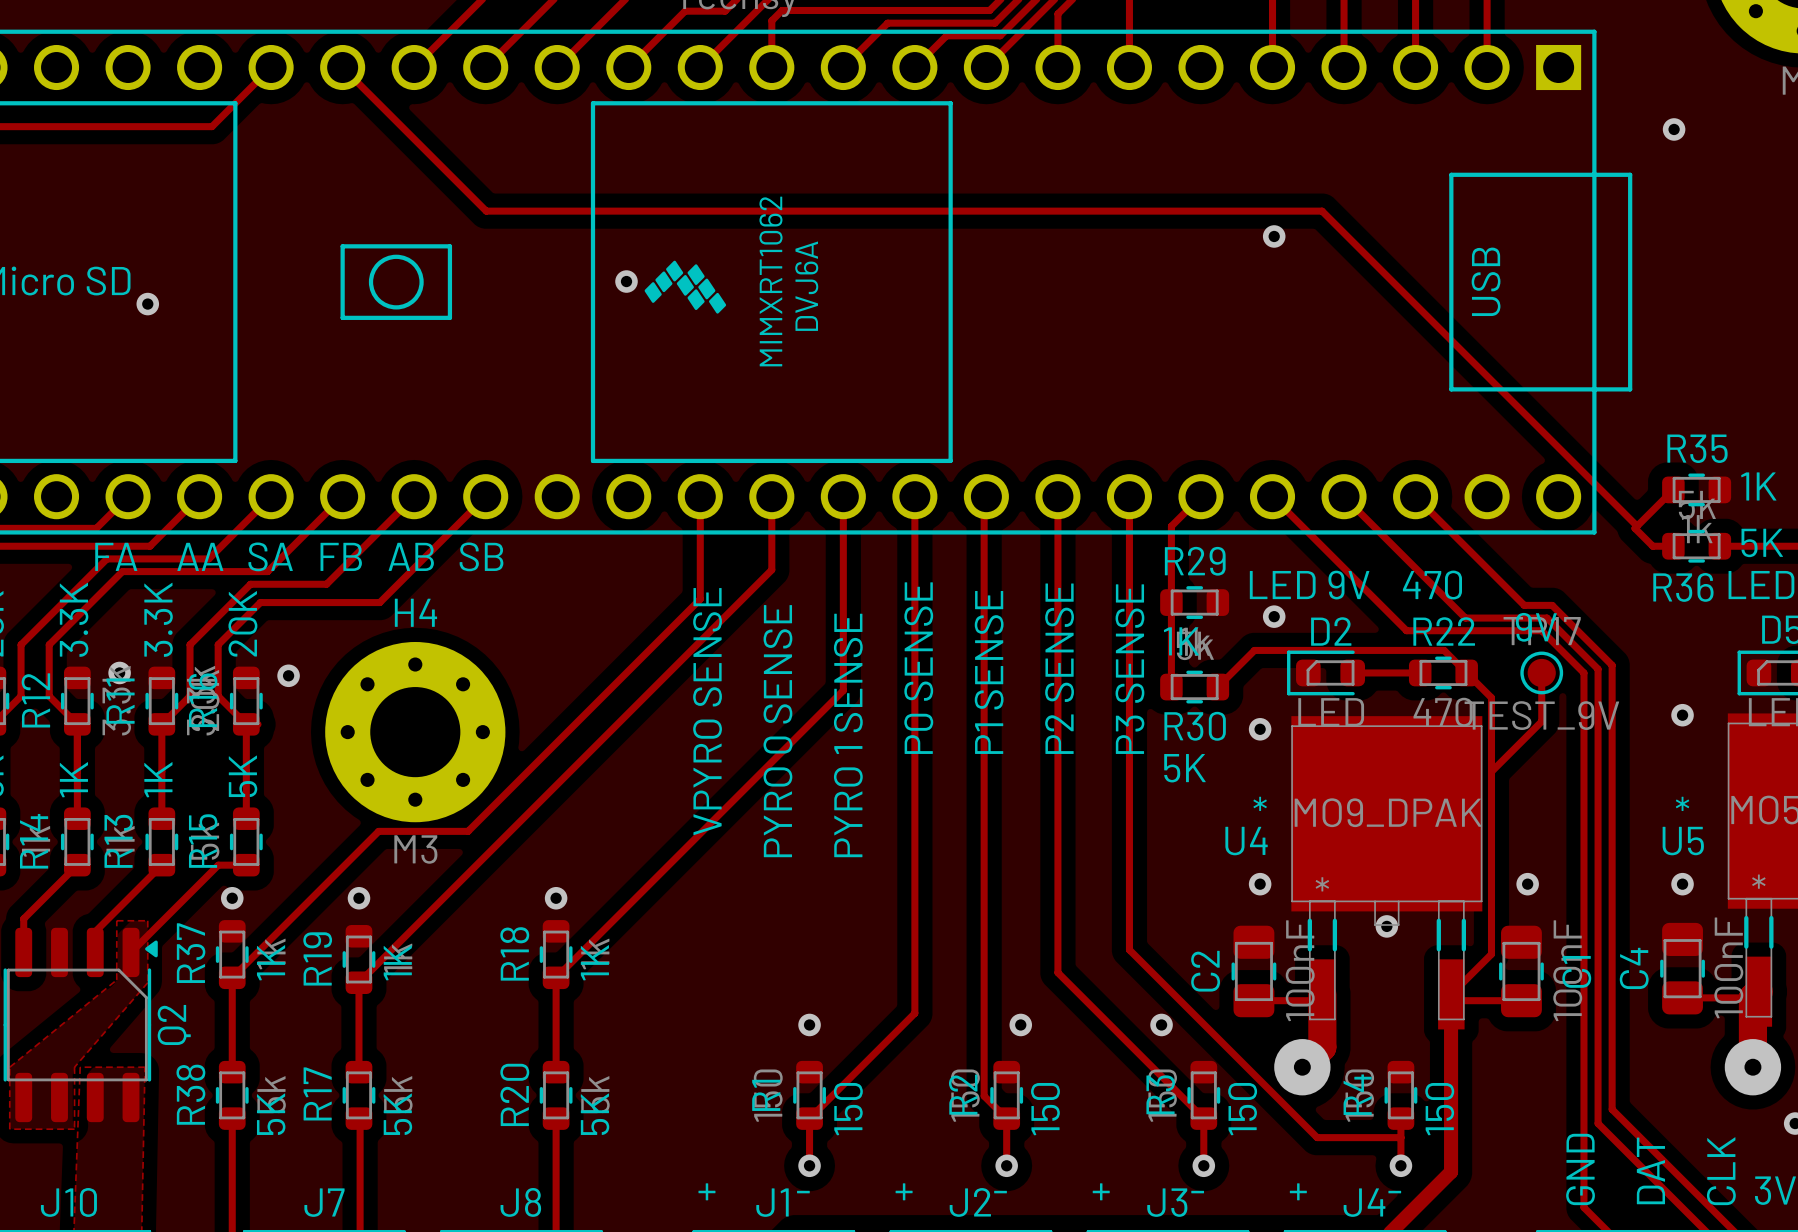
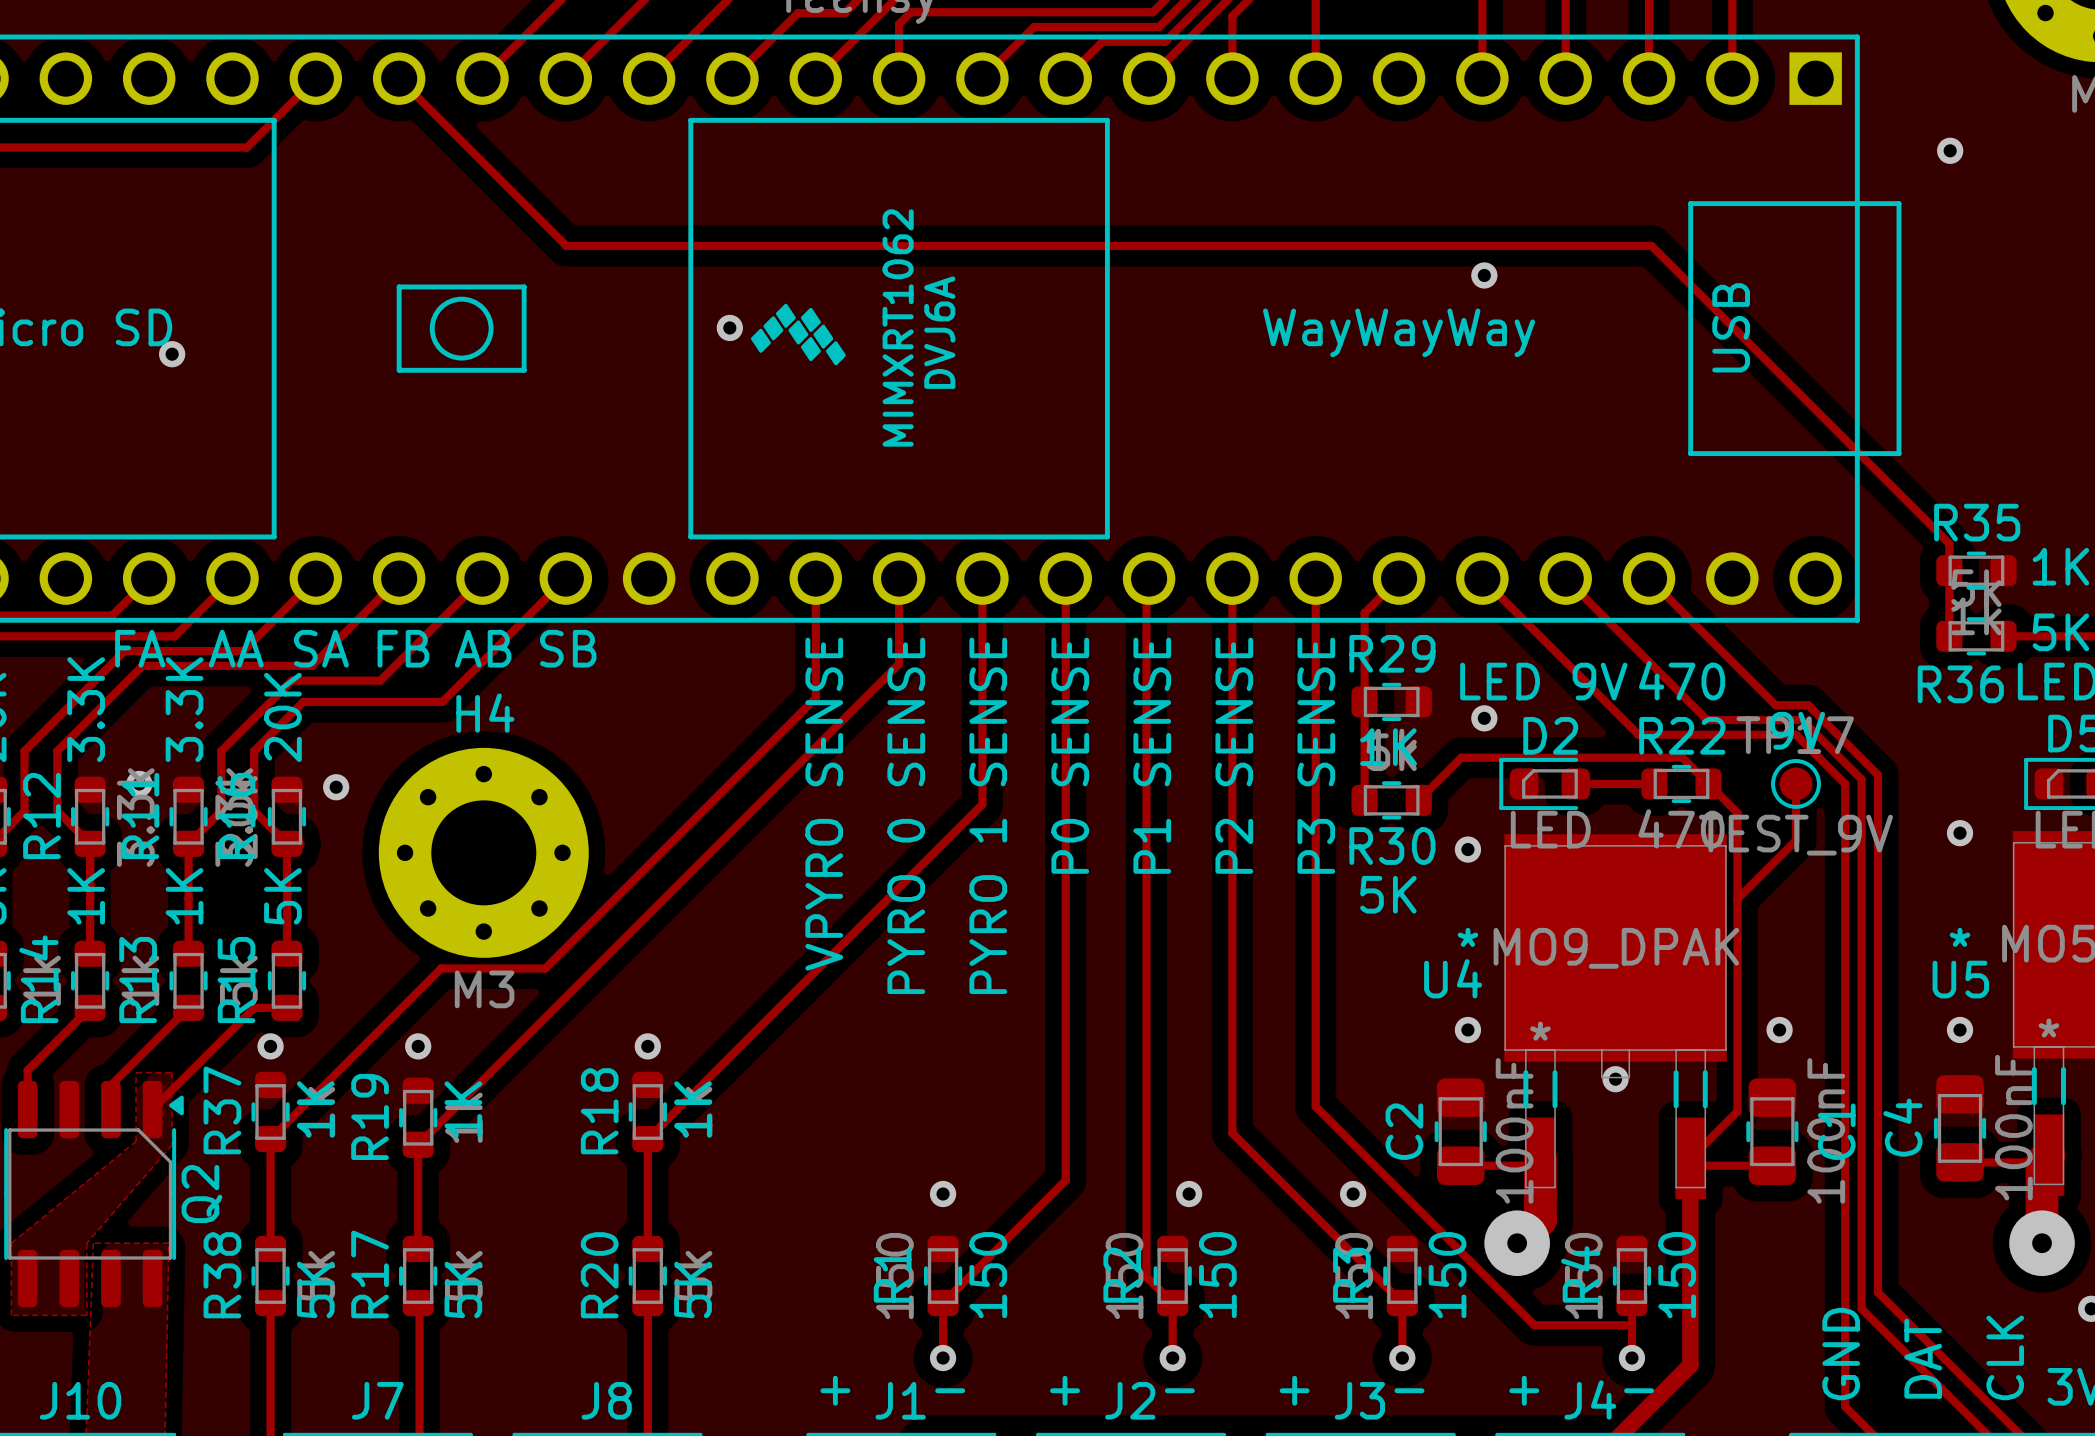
track: (1322, 211) (1637, 526) -> (1540, 245) (1651, 245) (1949, 543) (1949, 636)
text: none -> WayWayWay (1399, 332)
track: (1673, 489) (1634, 528) (1652, 546) (1673, 546) -> none

